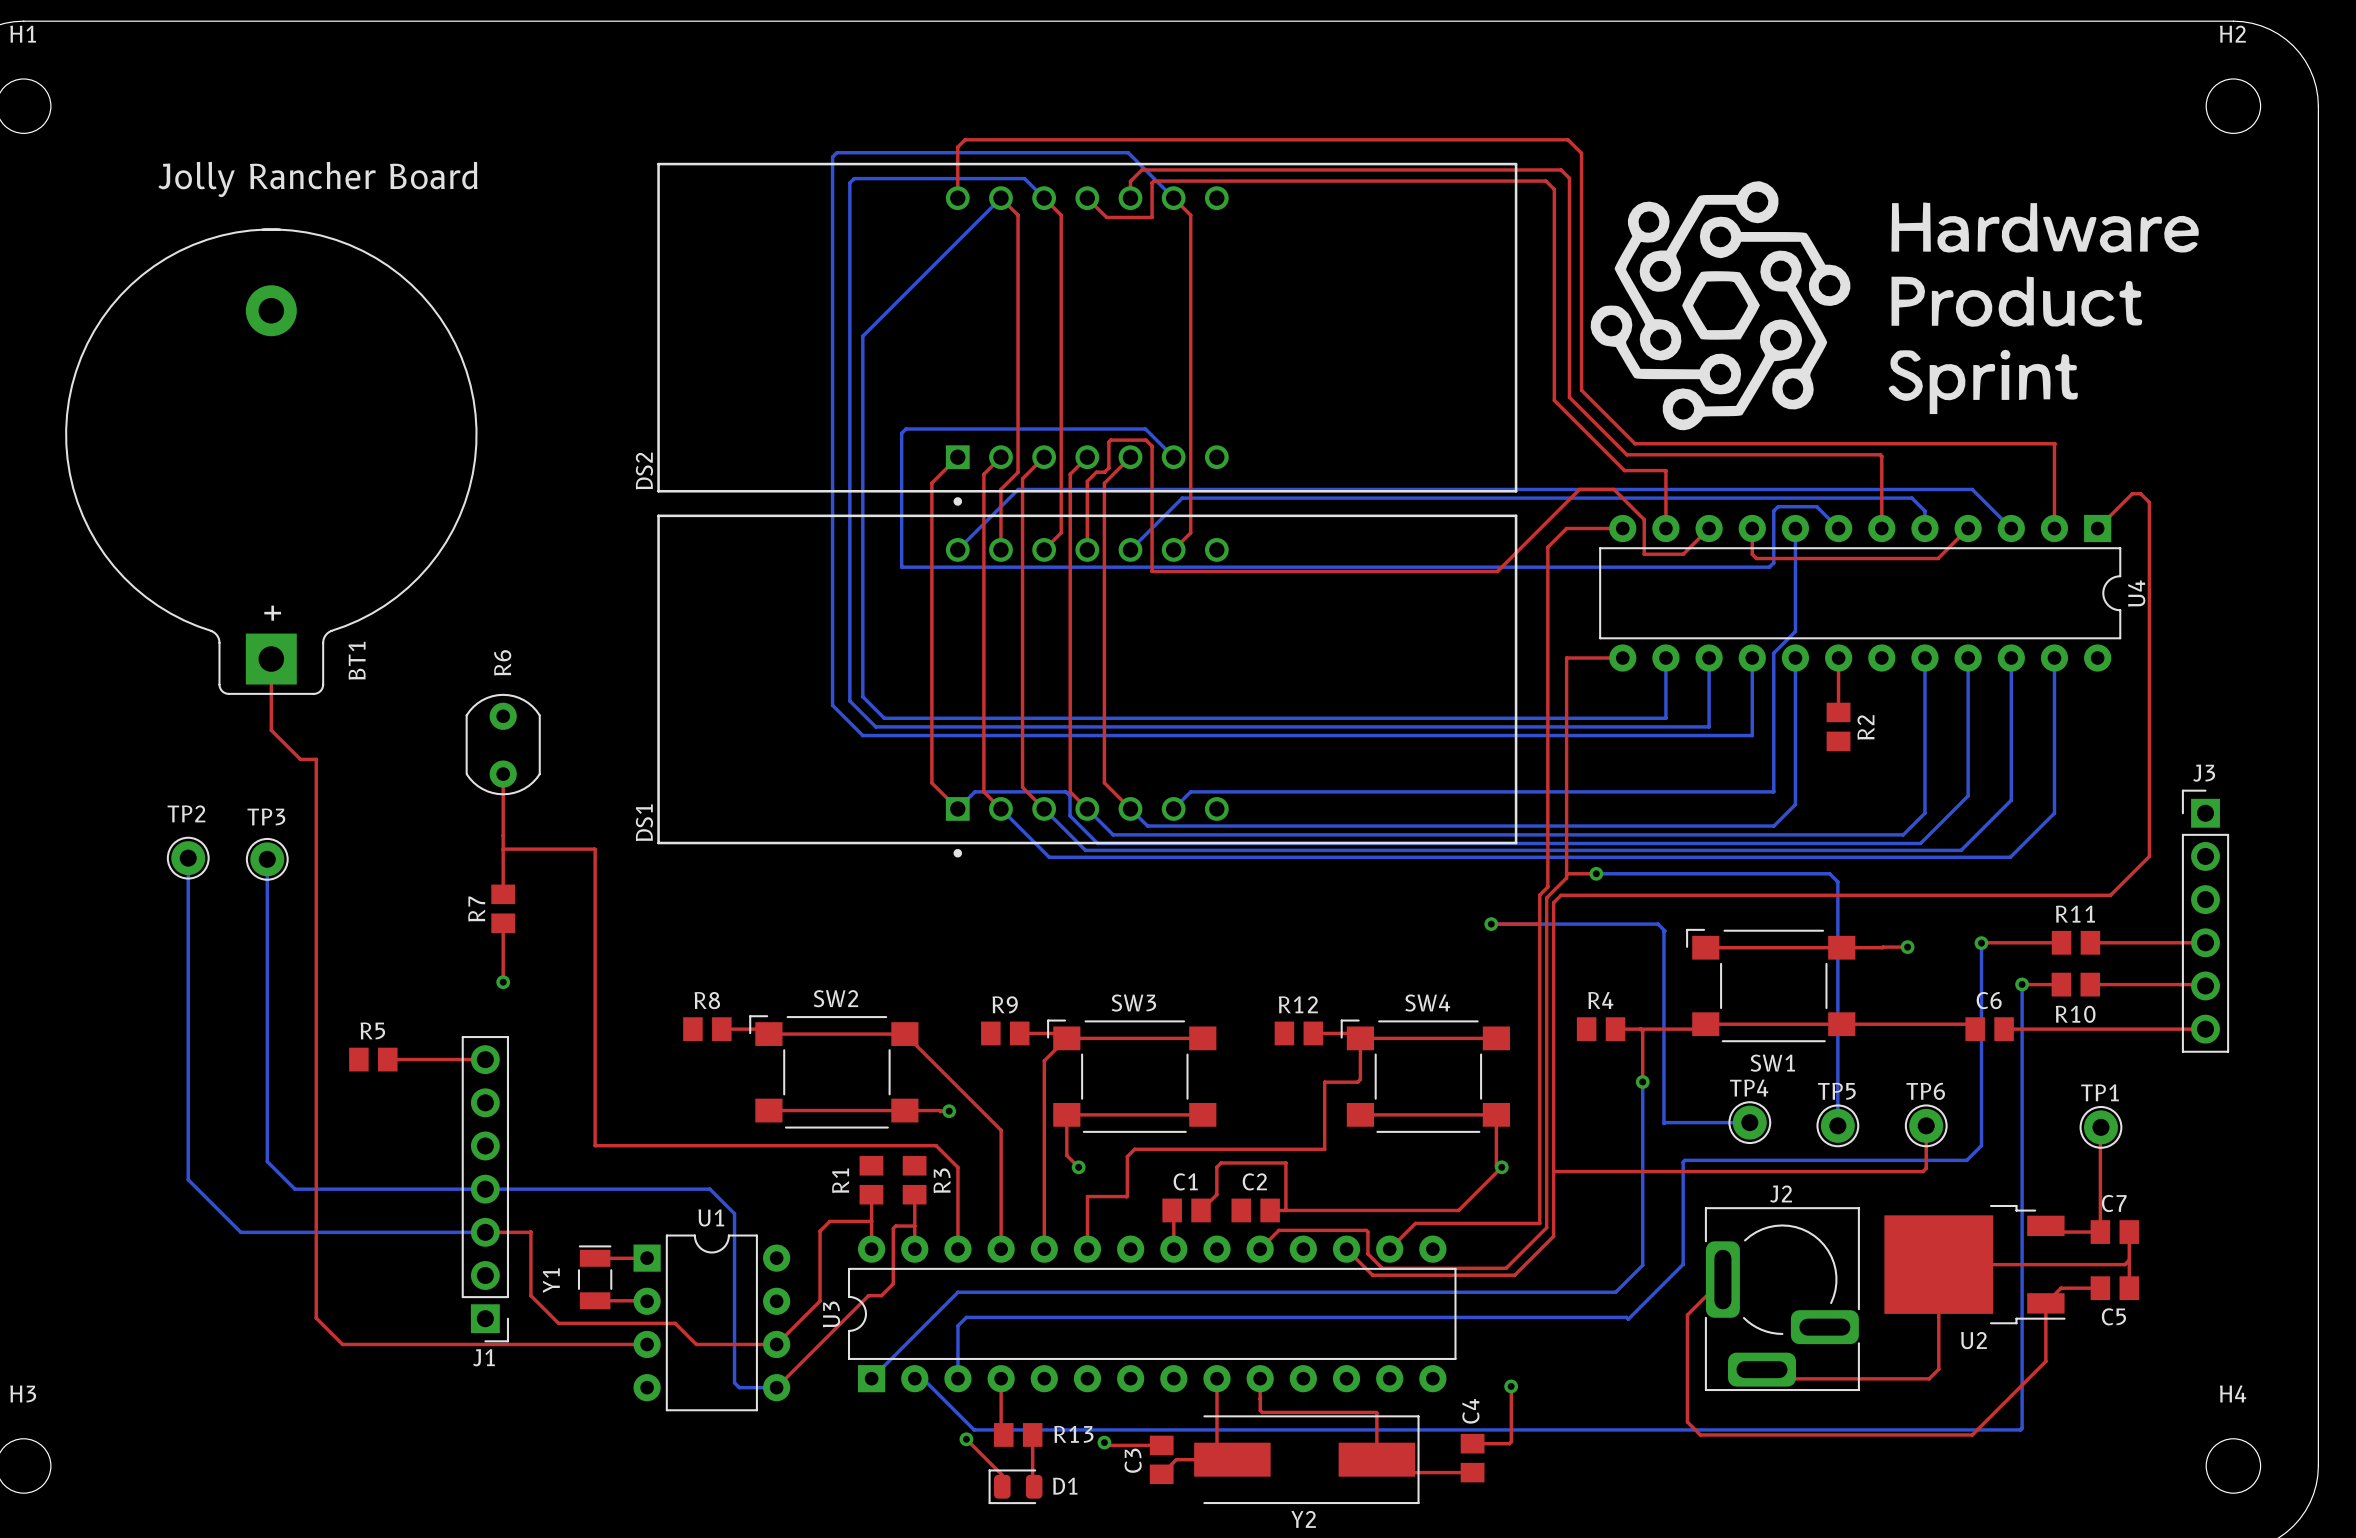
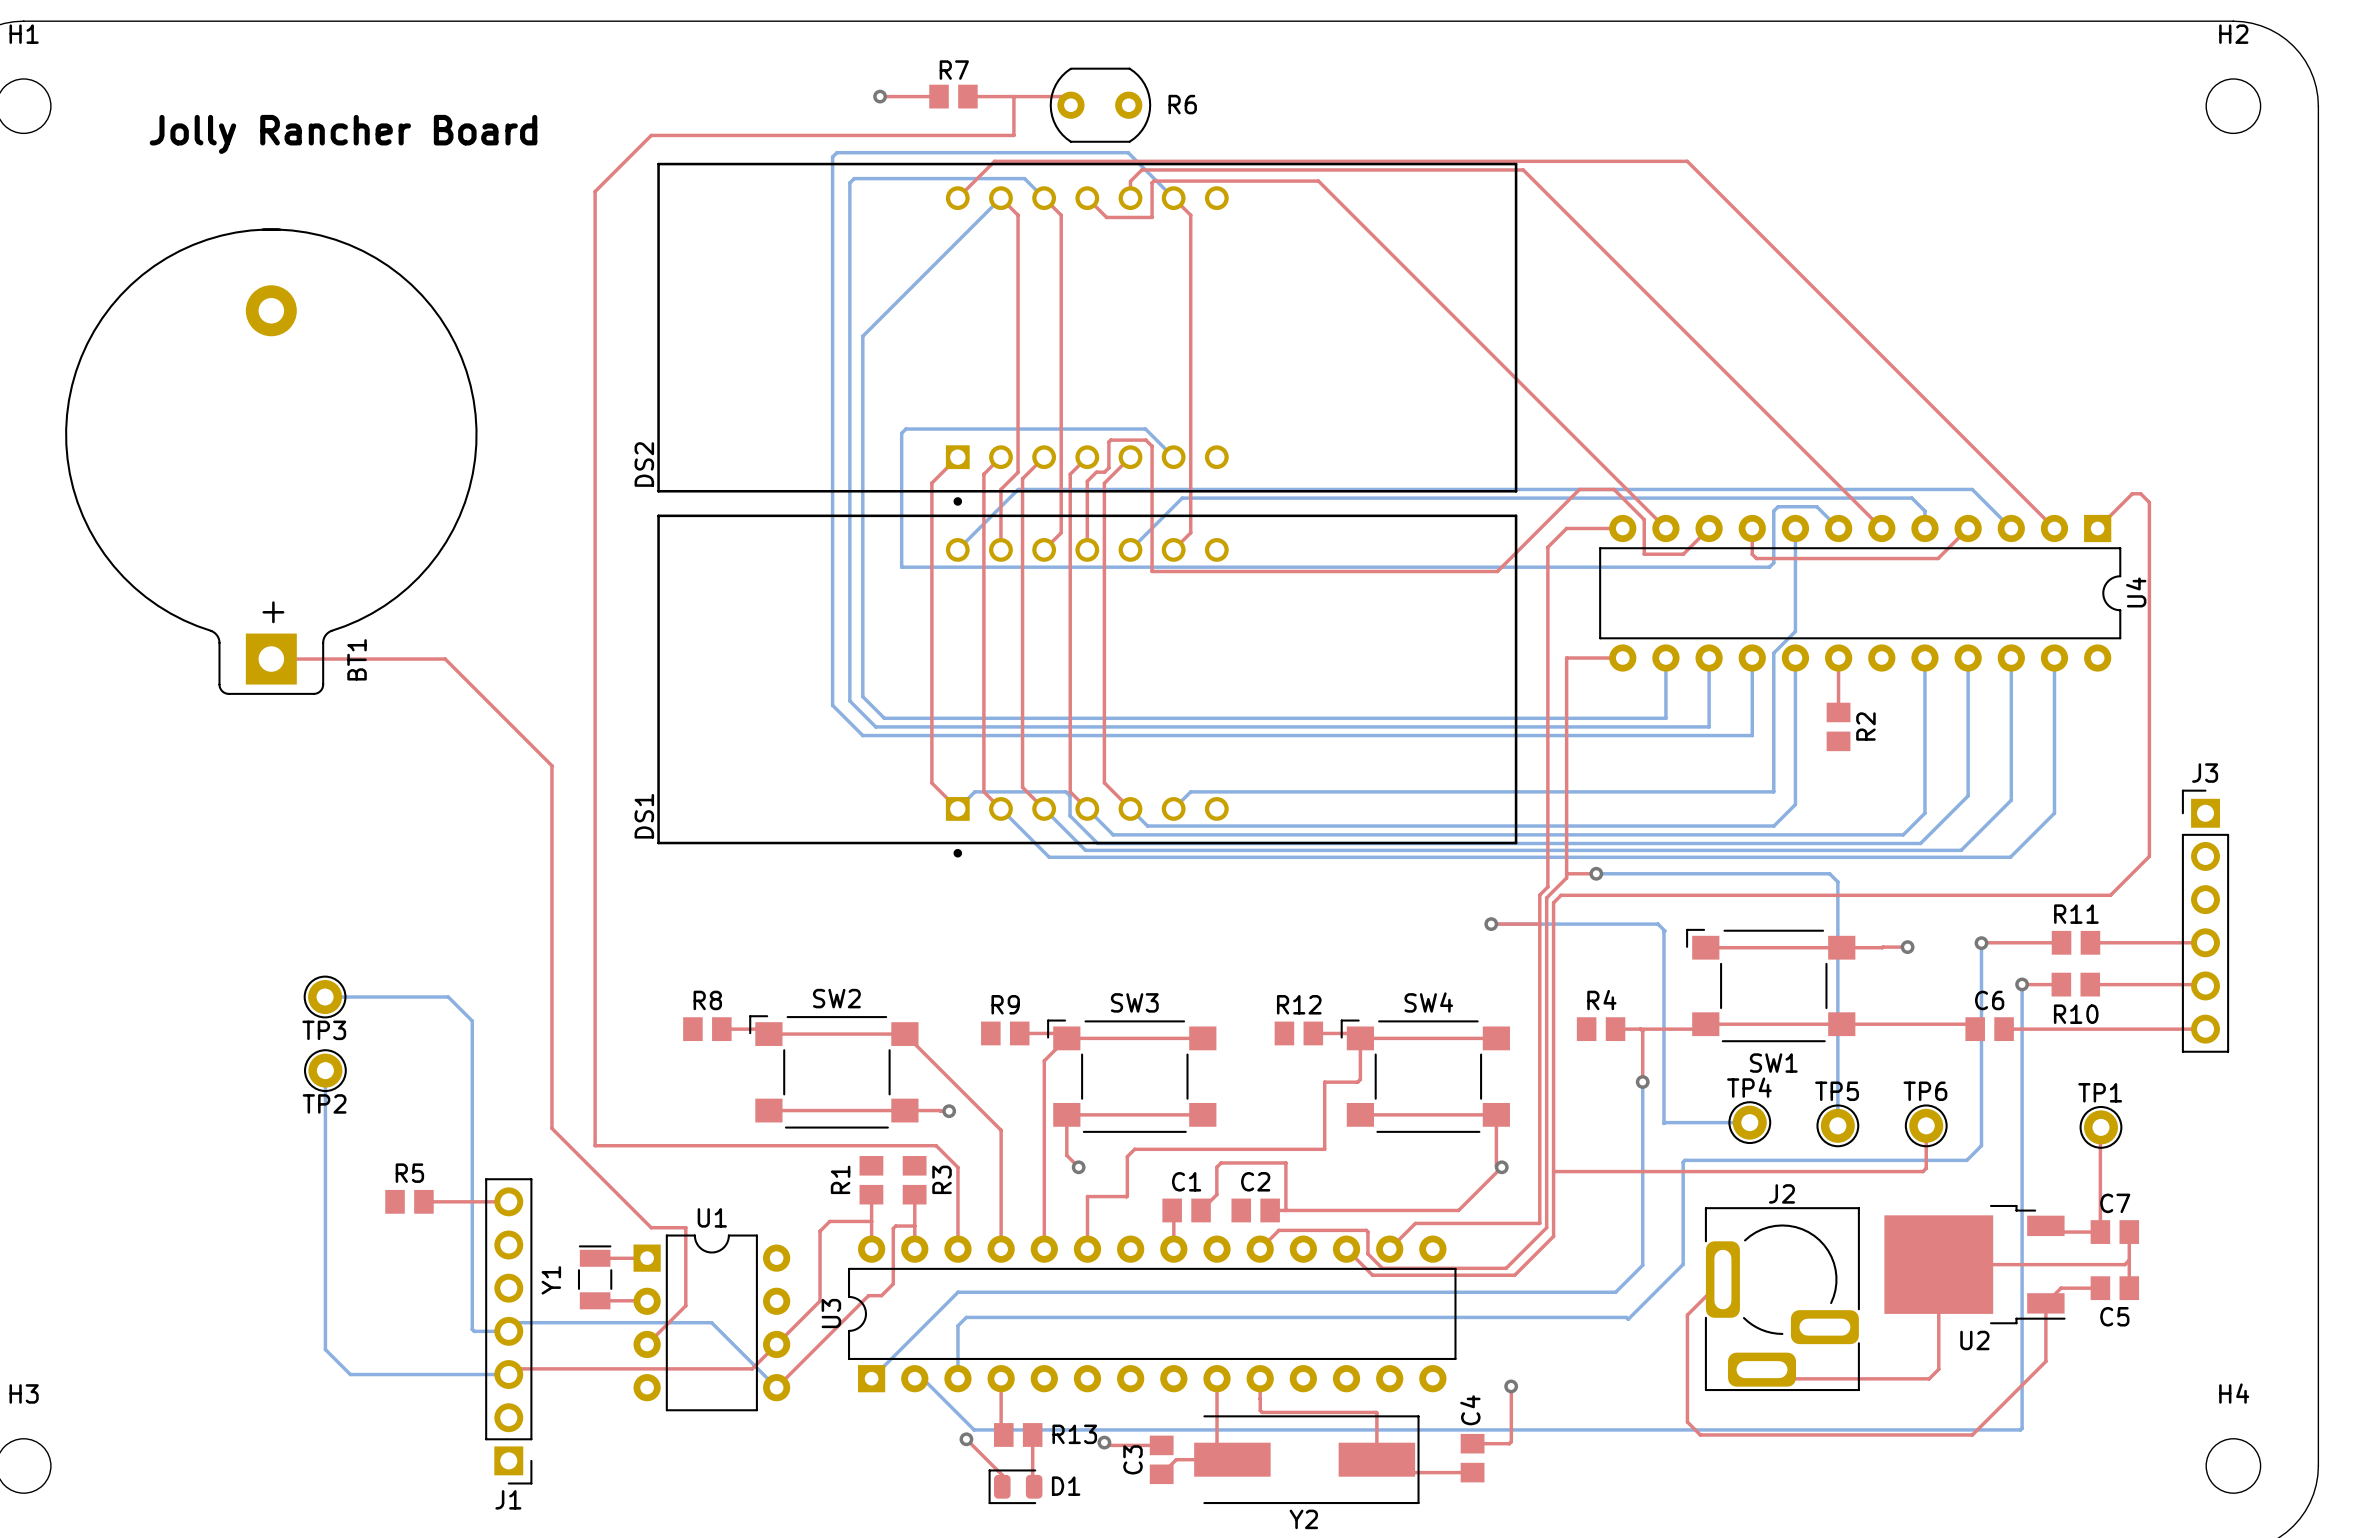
top track: none -> (880, 96) (939, 96)
via: none -> (880, 96)
top track: none -> (967, 96) (1062, 96) (1070, 105)
top track: (1523, 169) (1561, 169) (1569, 178) (1569, 397) (1626, 454) (1880, 454) (1881, 528) -> (1523, 169) (1881, 528)
text position: Jolly Rancher Board (317, 179) -> Jolly Rancher Board (343, 134)
top track: (1318, 181) (1545, 181) (1554, 189) (1554, 400) (1624, 470) (1665, 470) (1665, 528) -> (1318, 181) (1665, 528)
drawing: [1590, 181, 2199, 431] -> none
top track: (957, 198) (957, 147) (965, 139) (1568, 139) (1581, 153) (1581, 390) (1635, 443) (2054, 443) (2054, 528) -> (957, 198) (994, 161) (1687, 161) (2054, 528)
top track: (271, 659) (271, 730) (300, 759) (316, 759) (316, 1318) (342, 1344) (647, 1344) -> (271, 659) (445, 659) (551, 765) (551, 1128) (651, 1227) (685, 1227) (685, 1305) (647, 1344)
R6 rotation: 0° (503, 744) -> 90° clockwise (1100, 105)
R6 position: (503, 744) -> (1100, 105)
top track: (503, 774) (503, 894) -> none
TP2 name position: TP2 (186, 813) -> TP2 (324, 1103)
TP3 name position: TP3 (266, 816) -> TP3 (324, 1030)
top track: (503, 849) (595, 849) -> (1013, 96) (1013, 135) (651, 135) (595, 191) (595, 849)
bottom track: (188, 858) (188, 1179) (240, 1232) (485, 1232) -> none
TP2 position: (188, 858) -> (325, 1070)
bottom track: (267, 859) (267, 1161) (294, 1189) (709, 1189) (734, 1213) (734, 1382) (739, 1387) (776, 1387) -> (325, 997) (448, 997) (472, 1020) (472, 1329) (474, 1331) (508, 1331) (517, 1322) (711, 1322) (776, 1387)
TP3 position: (267, 859) -> (325, 997)
R7 rotation: 0° (503, 908) -> 90° clockwise (953, 96)
R7 position: (503, 908) -> (953, 96)
top track: (503, 923) (503, 982) -> none
via: (503, 982) -> none
R5 position: (373, 1059) -> (409, 1201)
top track: (387, 1059) (485, 1059) -> none
bottom track: none -> (325, 1070) (325, 1349) (350, 1374) (508, 1374)
J1 position: (485, 1189) -> (508, 1331)
top track: none -> (423, 1201) (508, 1201)
top track: (485, 1232) (530, 1231) (530, 1295) (558, 1323) (675, 1323) (696, 1344) (776, 1344) -> (508, 1374) (514, 1368) (752, 1368) (776, 1344)

